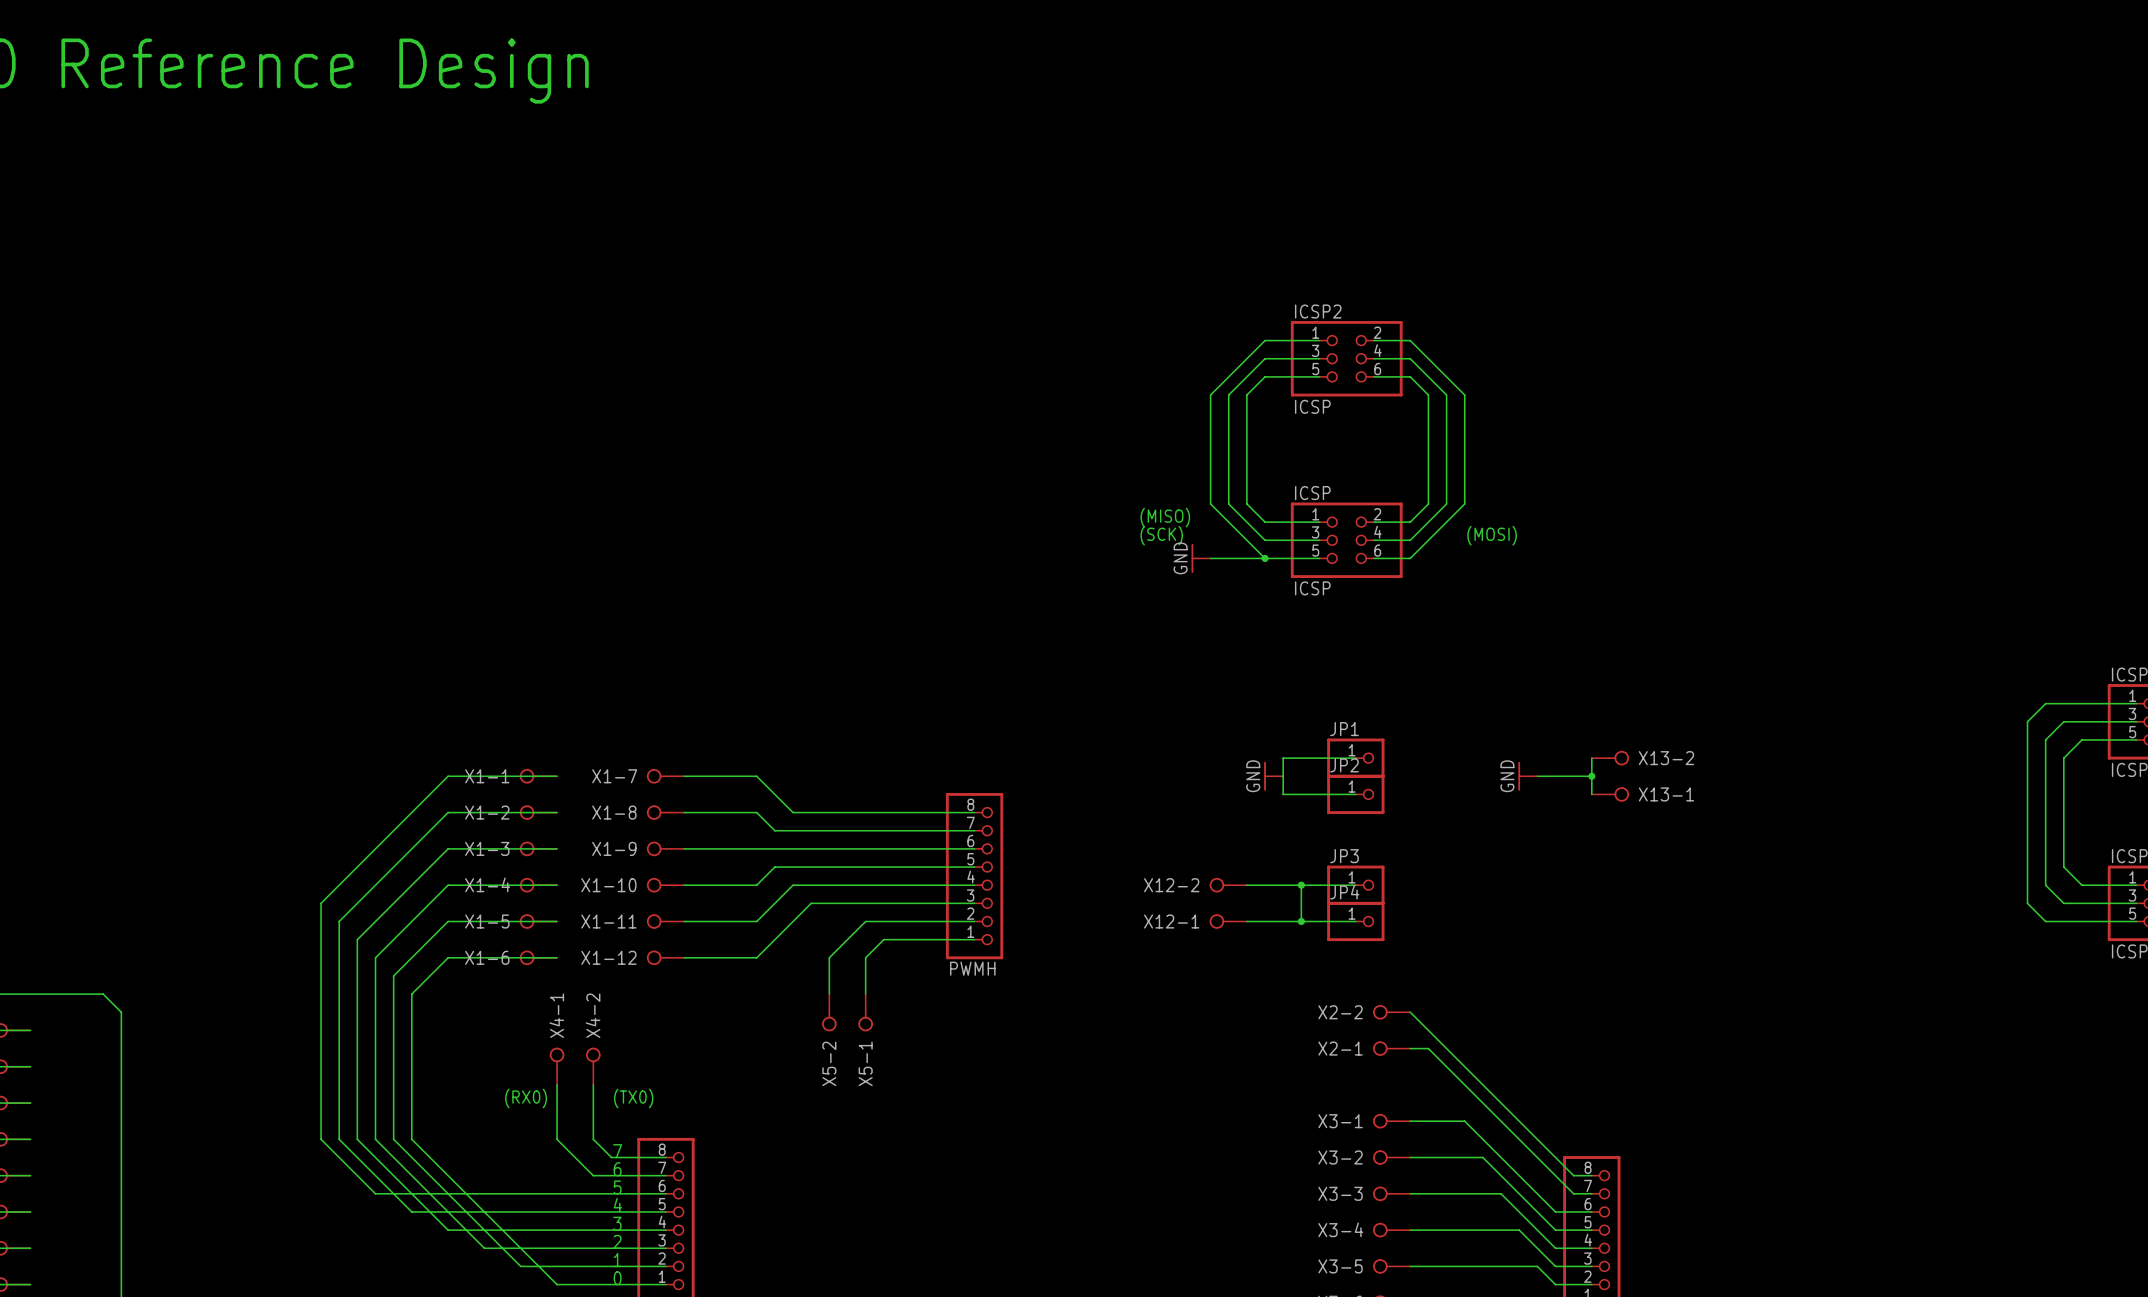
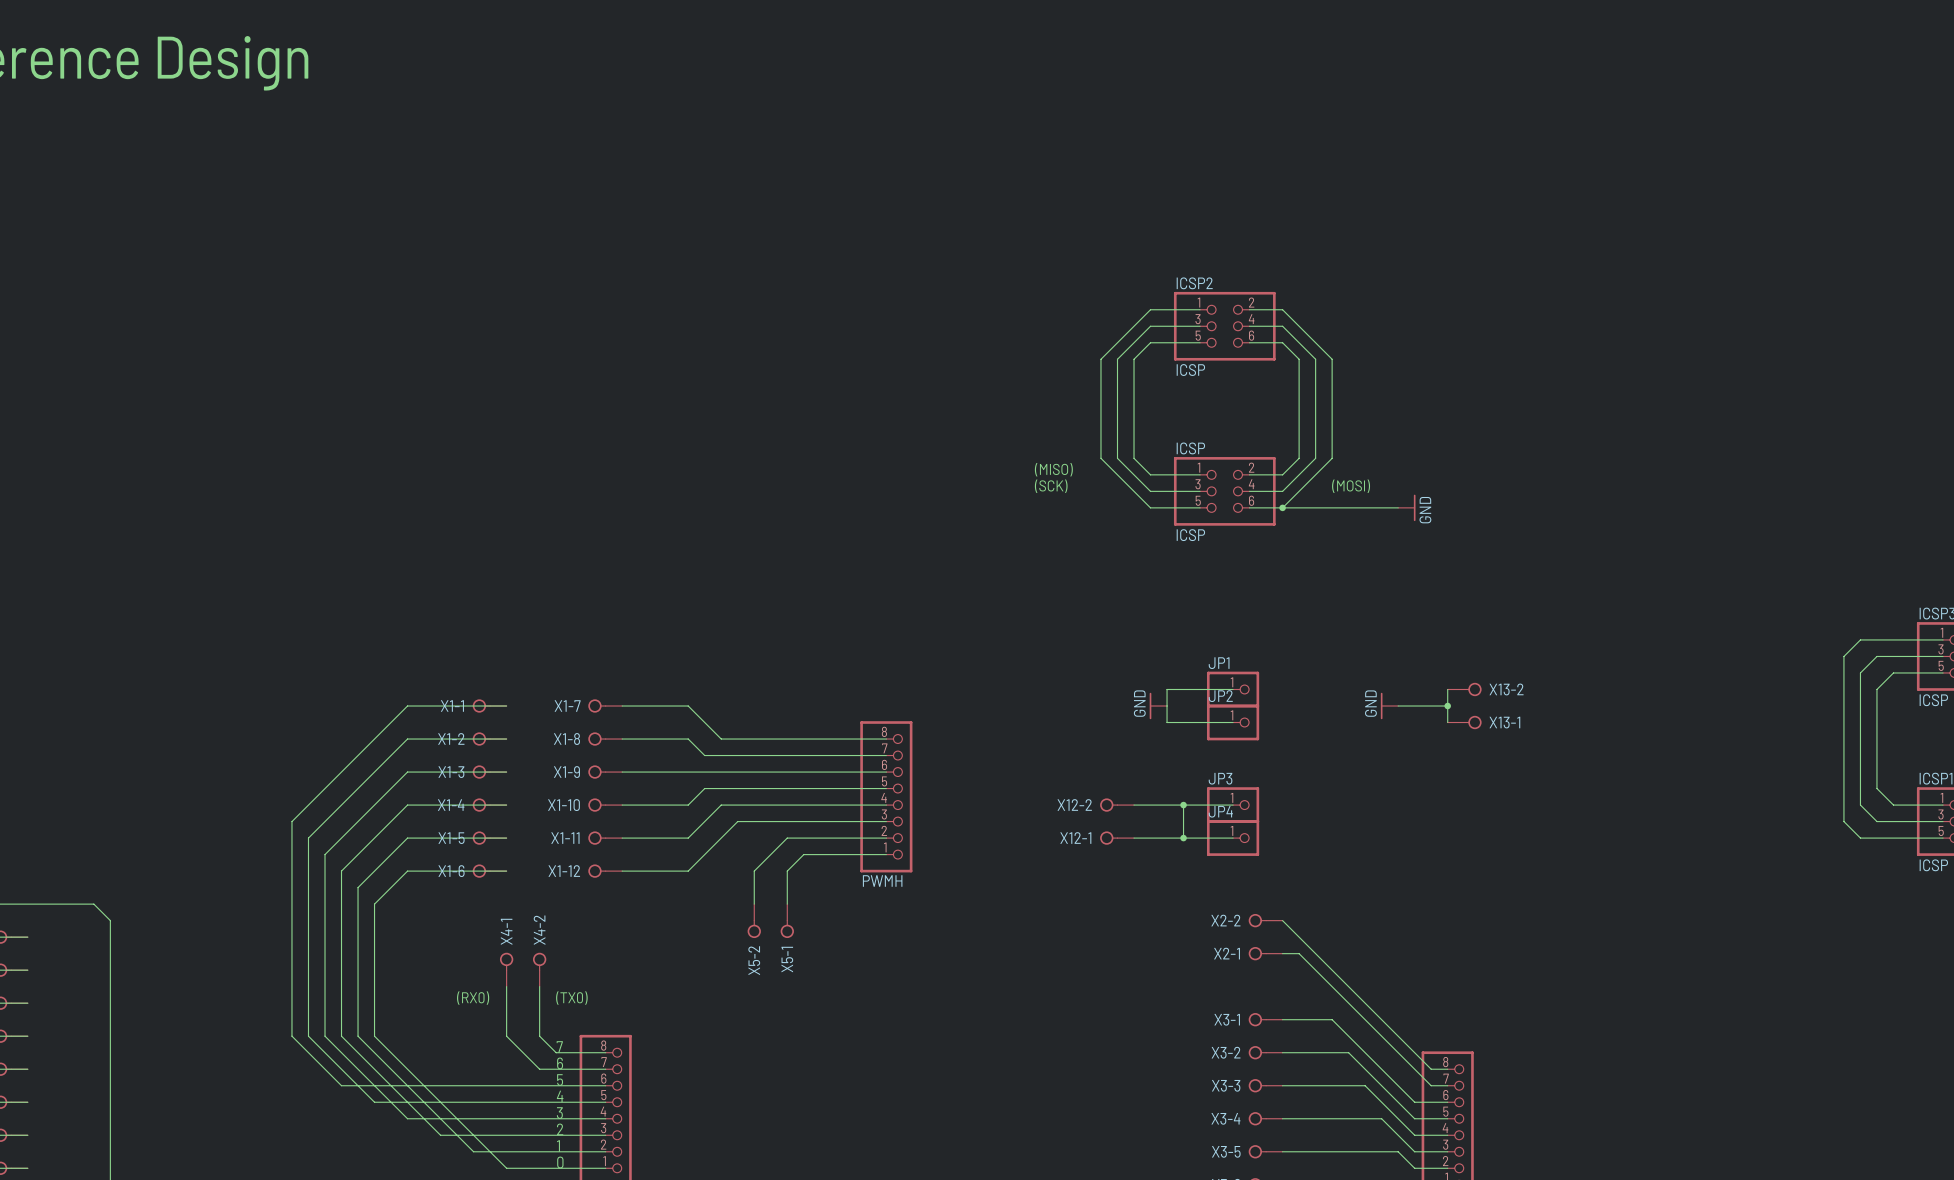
power symbol: GND (1201, 558) -> none
wire: (1210, 558) (1265, 558) -> none
junction: (1265, 558) -> none
wire: none -> (1282, 507) (1398, 507)
junction: none -> (1282, 507)
power symbol: none -> GND (1406, 507)

